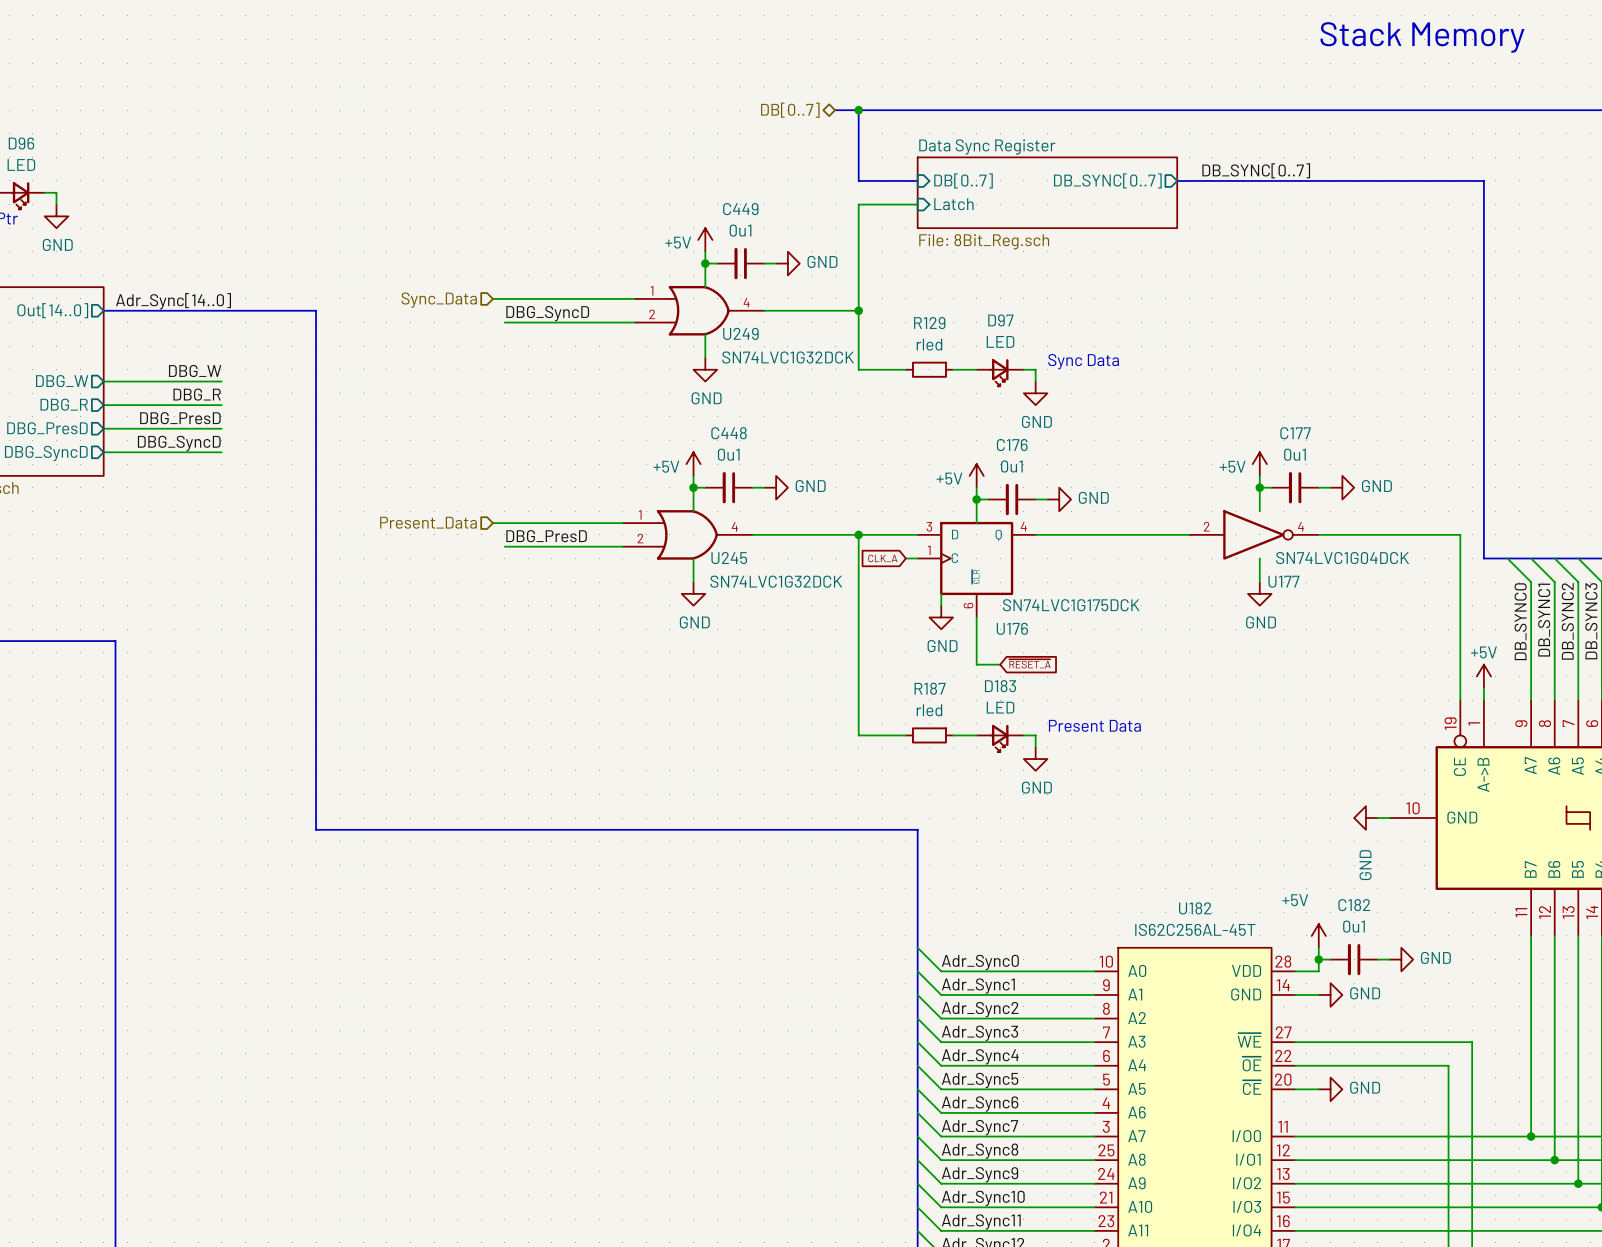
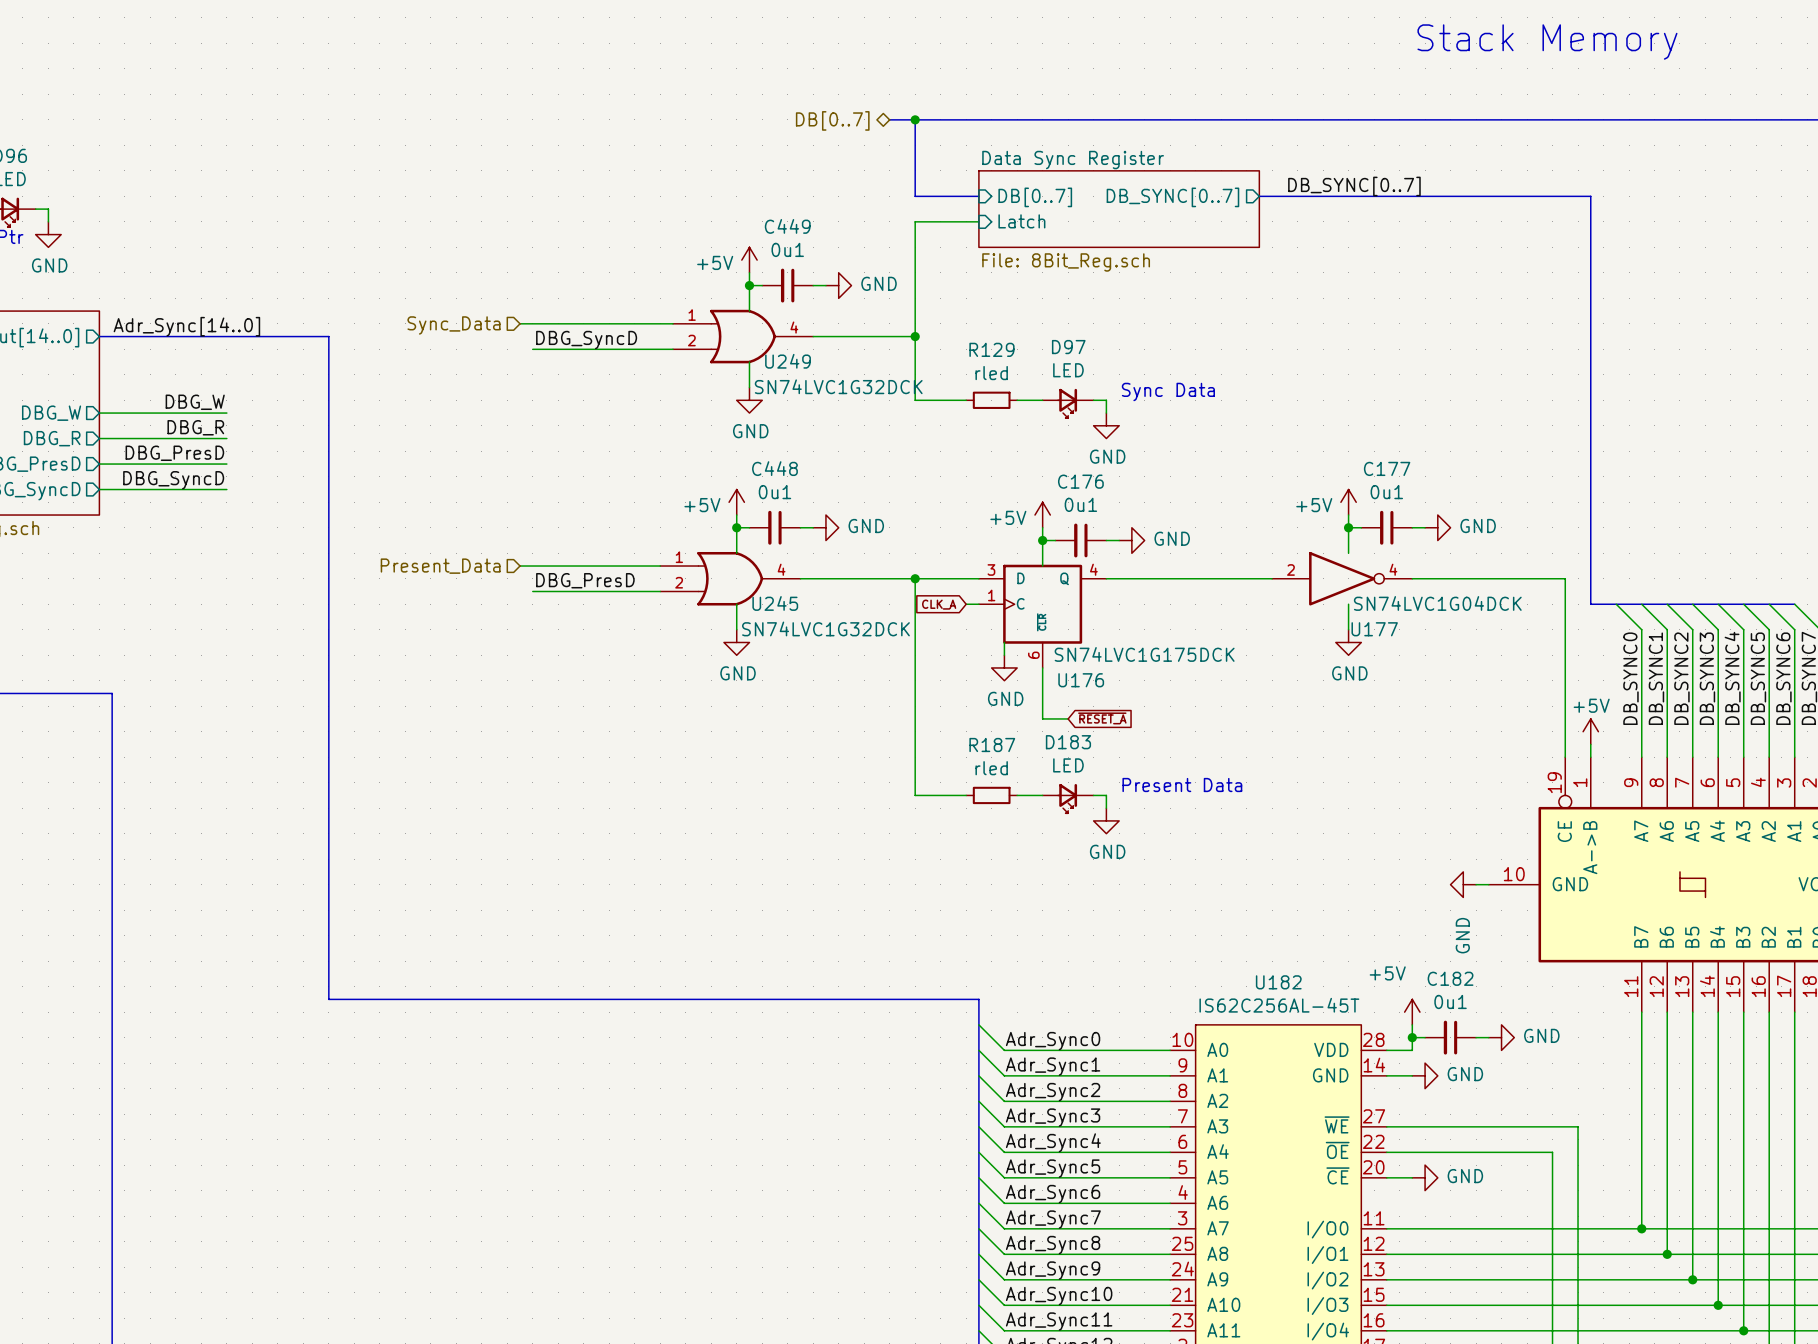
bus: (316, 829) (917, 829) (917, 924) -> (328, 897) (328, 999) (978, 999)

